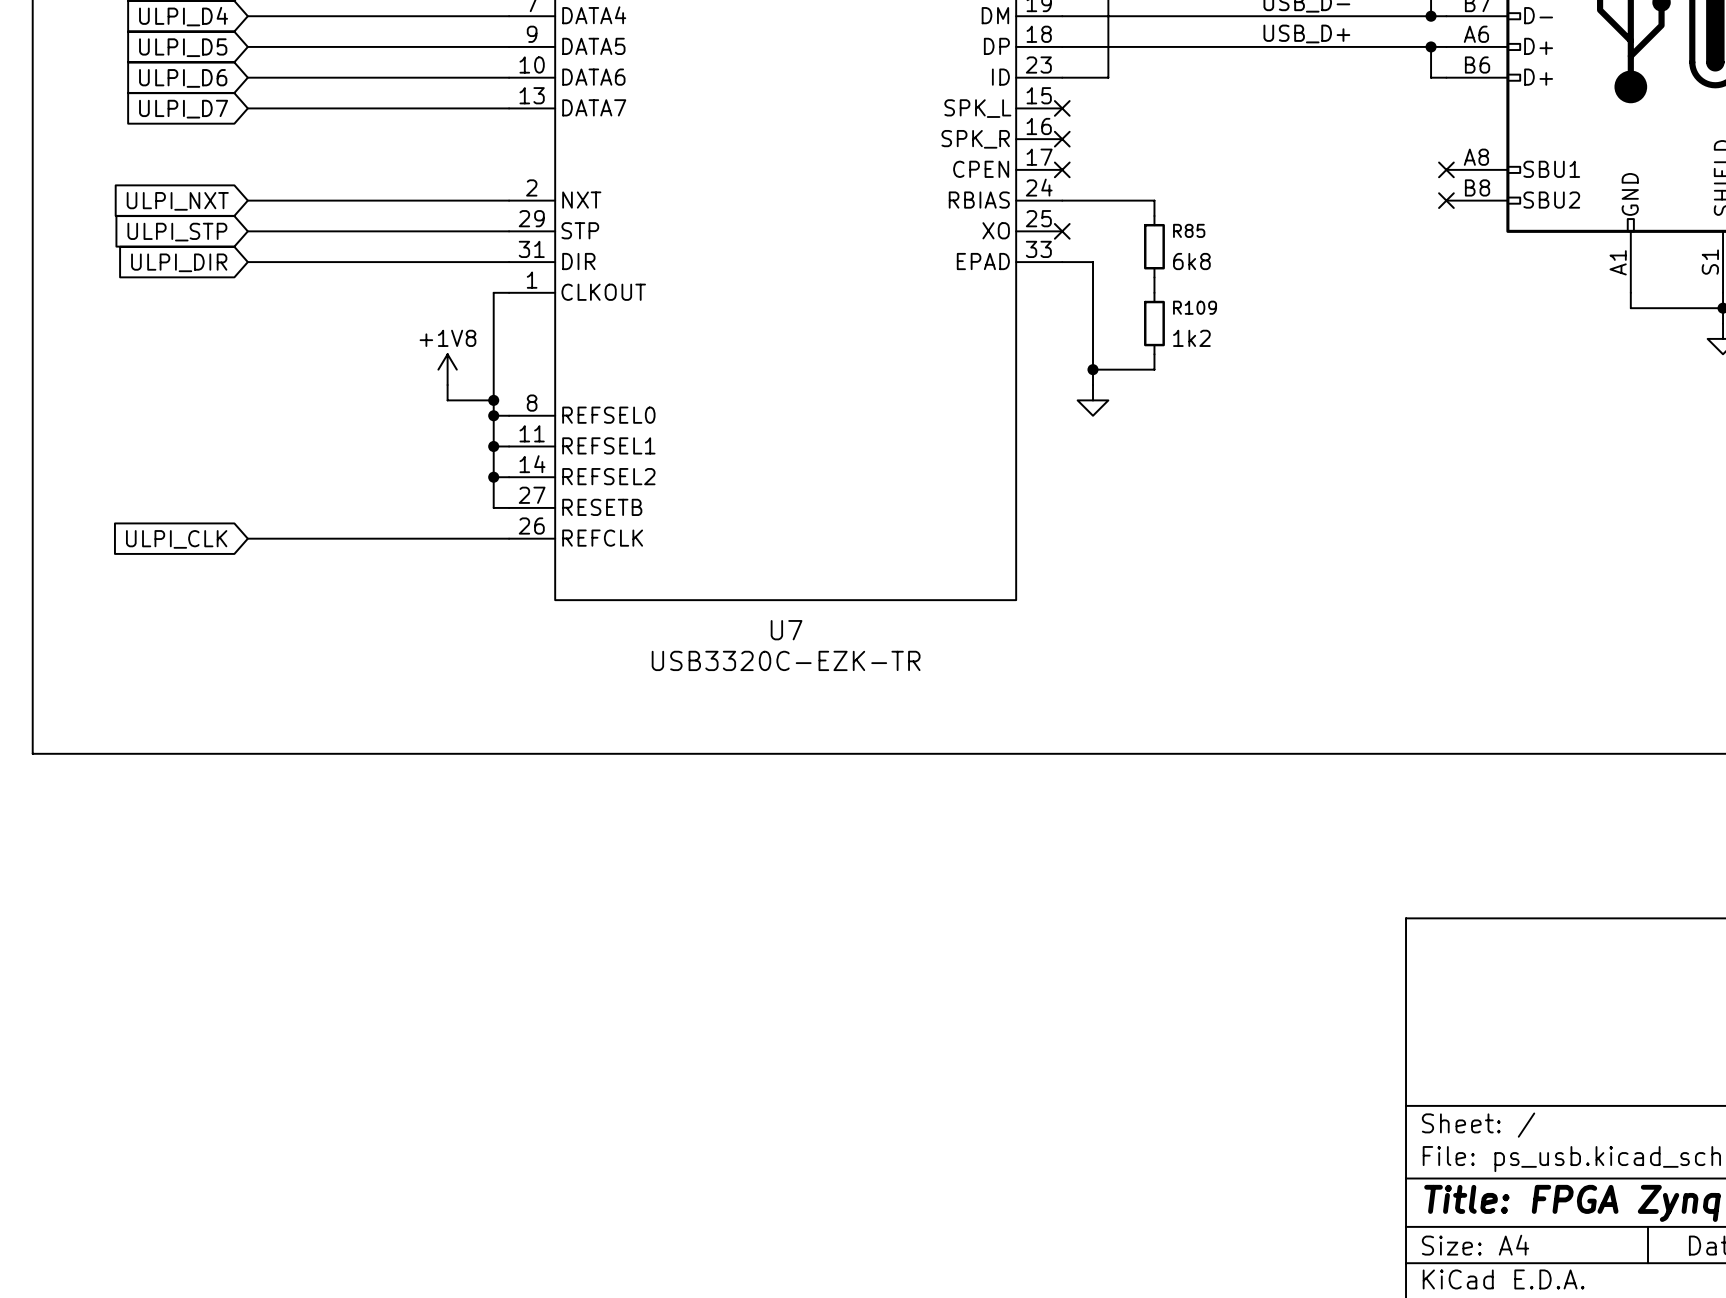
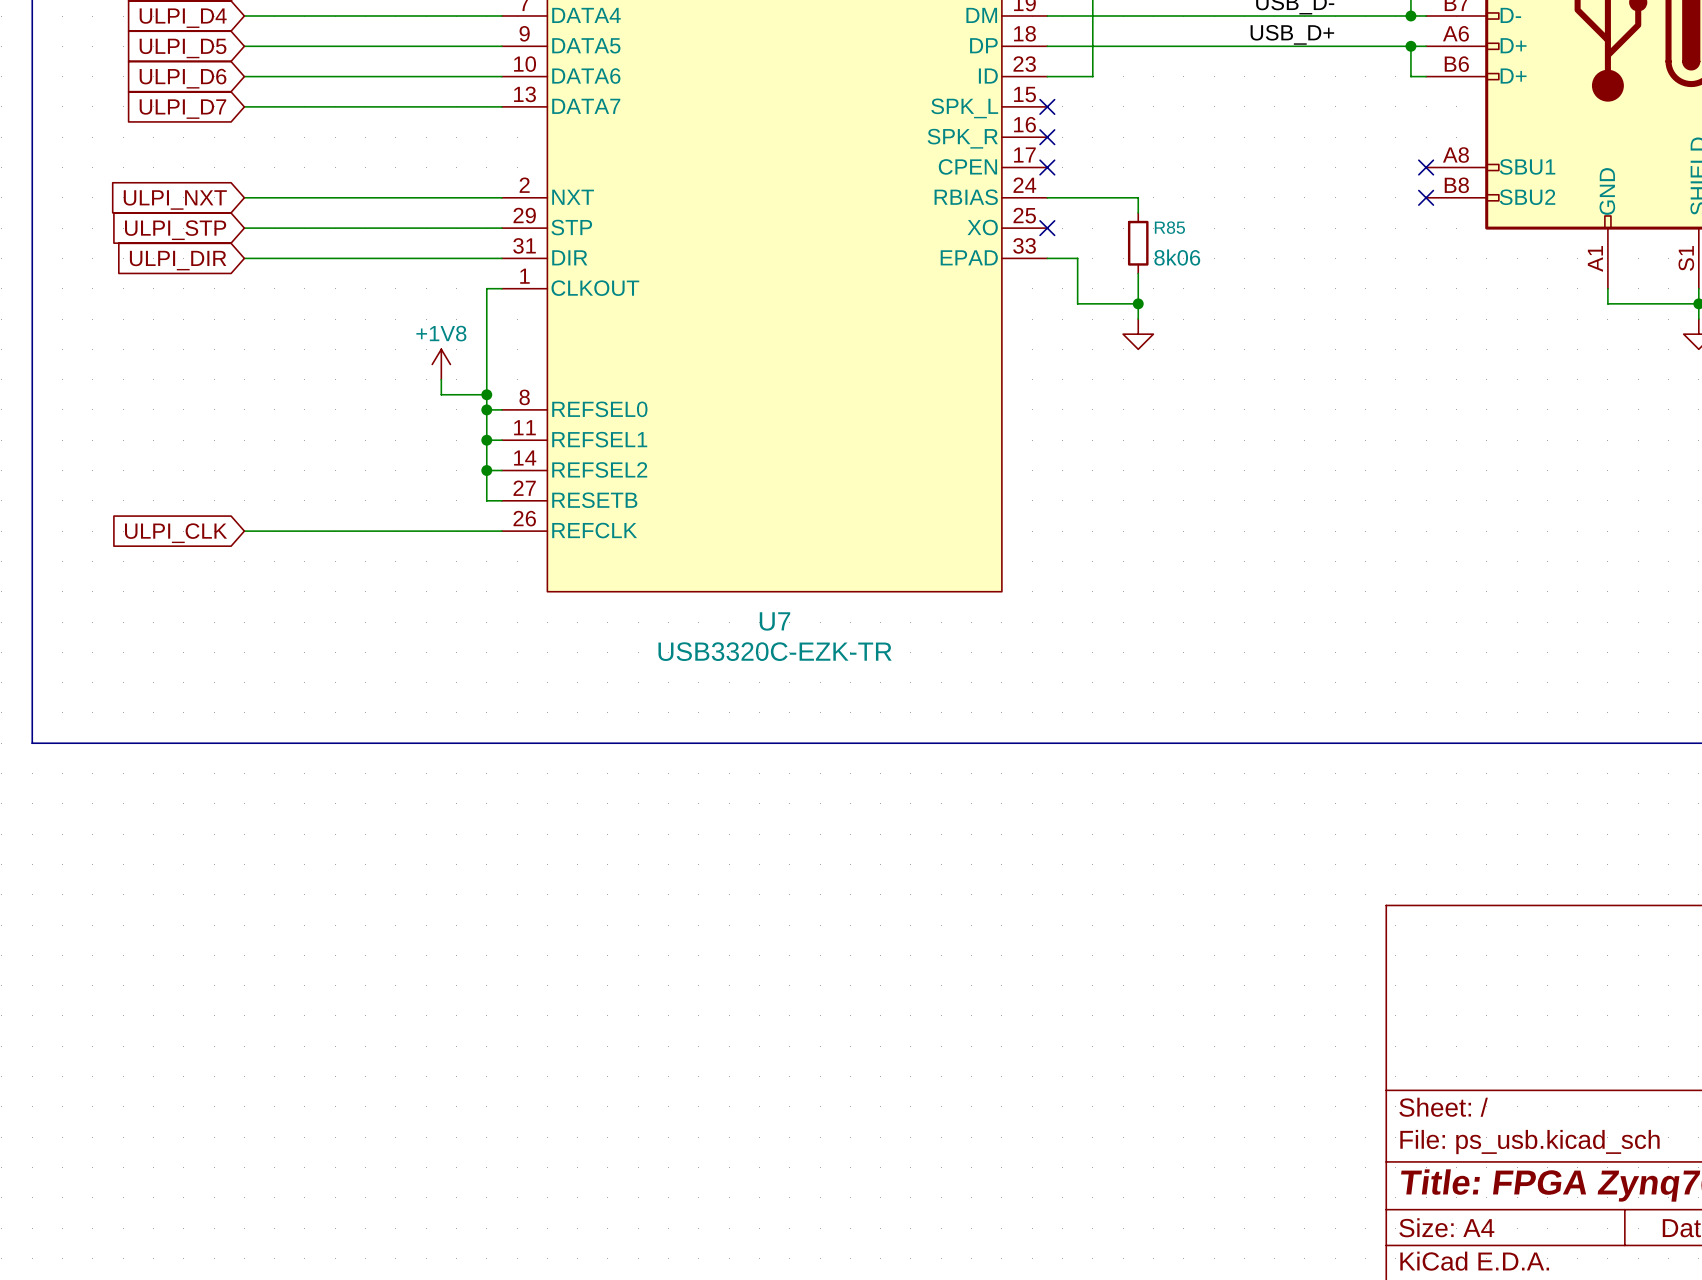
R85 value: 6k8 (1191, 261) -> 8k06 (1177, 257)
wire: none -> (1138, 288) (1138, 319)
wire: (1093, 308) (1093, 385) -> (1077, 303) (1138, 303)
junction: none -> (1138, 303)
R109: 1k2 (1154, 323) -> none
wire: (1154, 354) (1154, 369) (1093, 369) -> none
junction: (1093, 369) -> none
power symbol position: (1093, 400) -> (1138, 334)

